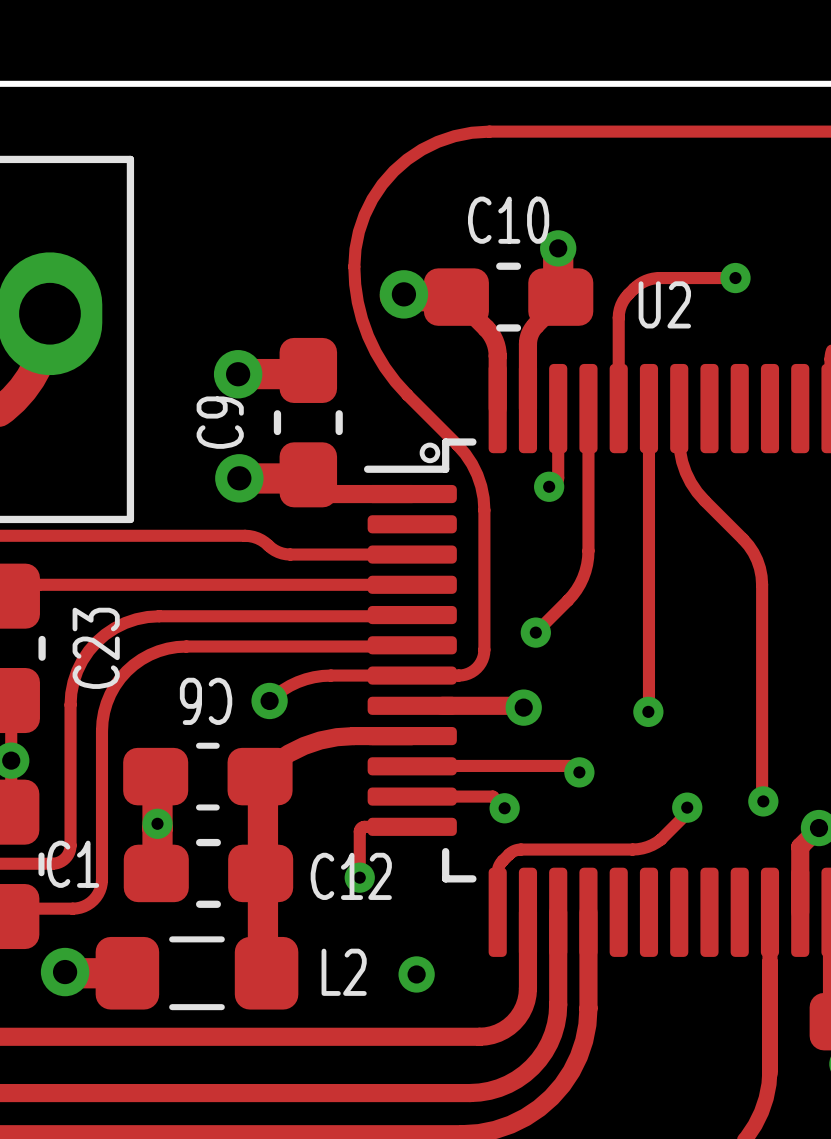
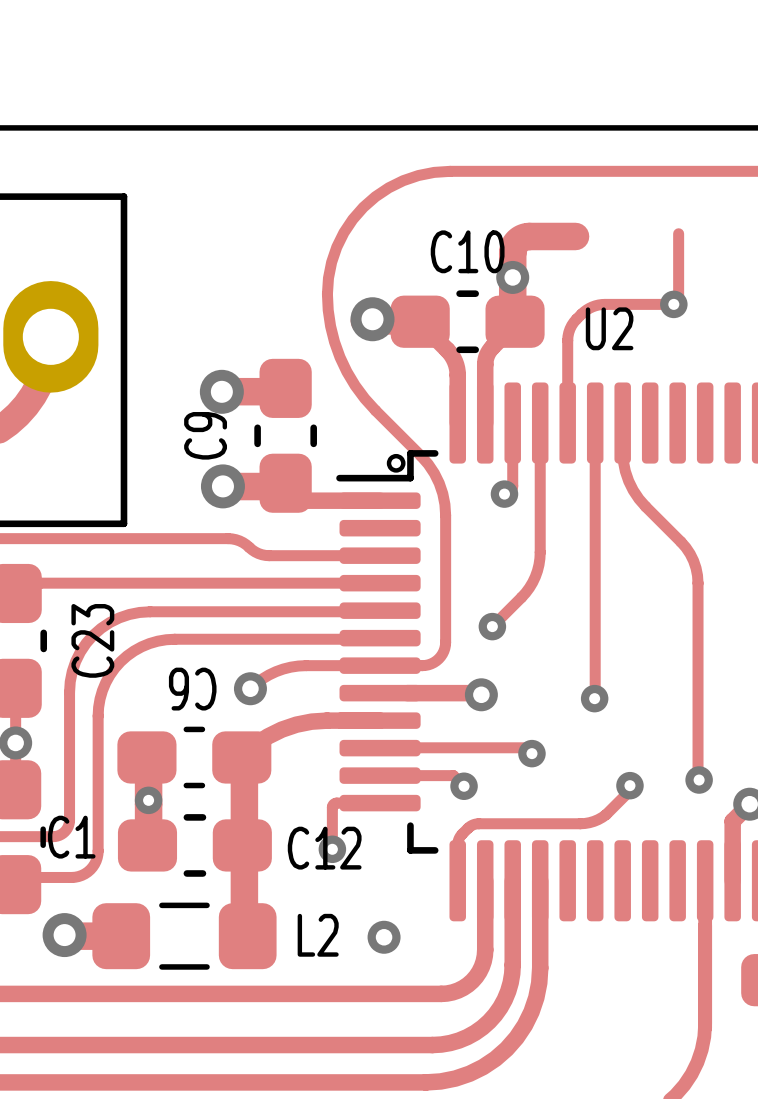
track: none -> (678, 233) (678, 300) (673, 304)
track: none -> (575, 236) (529, 236) (520, 239) (513, 249) (512, 275)

